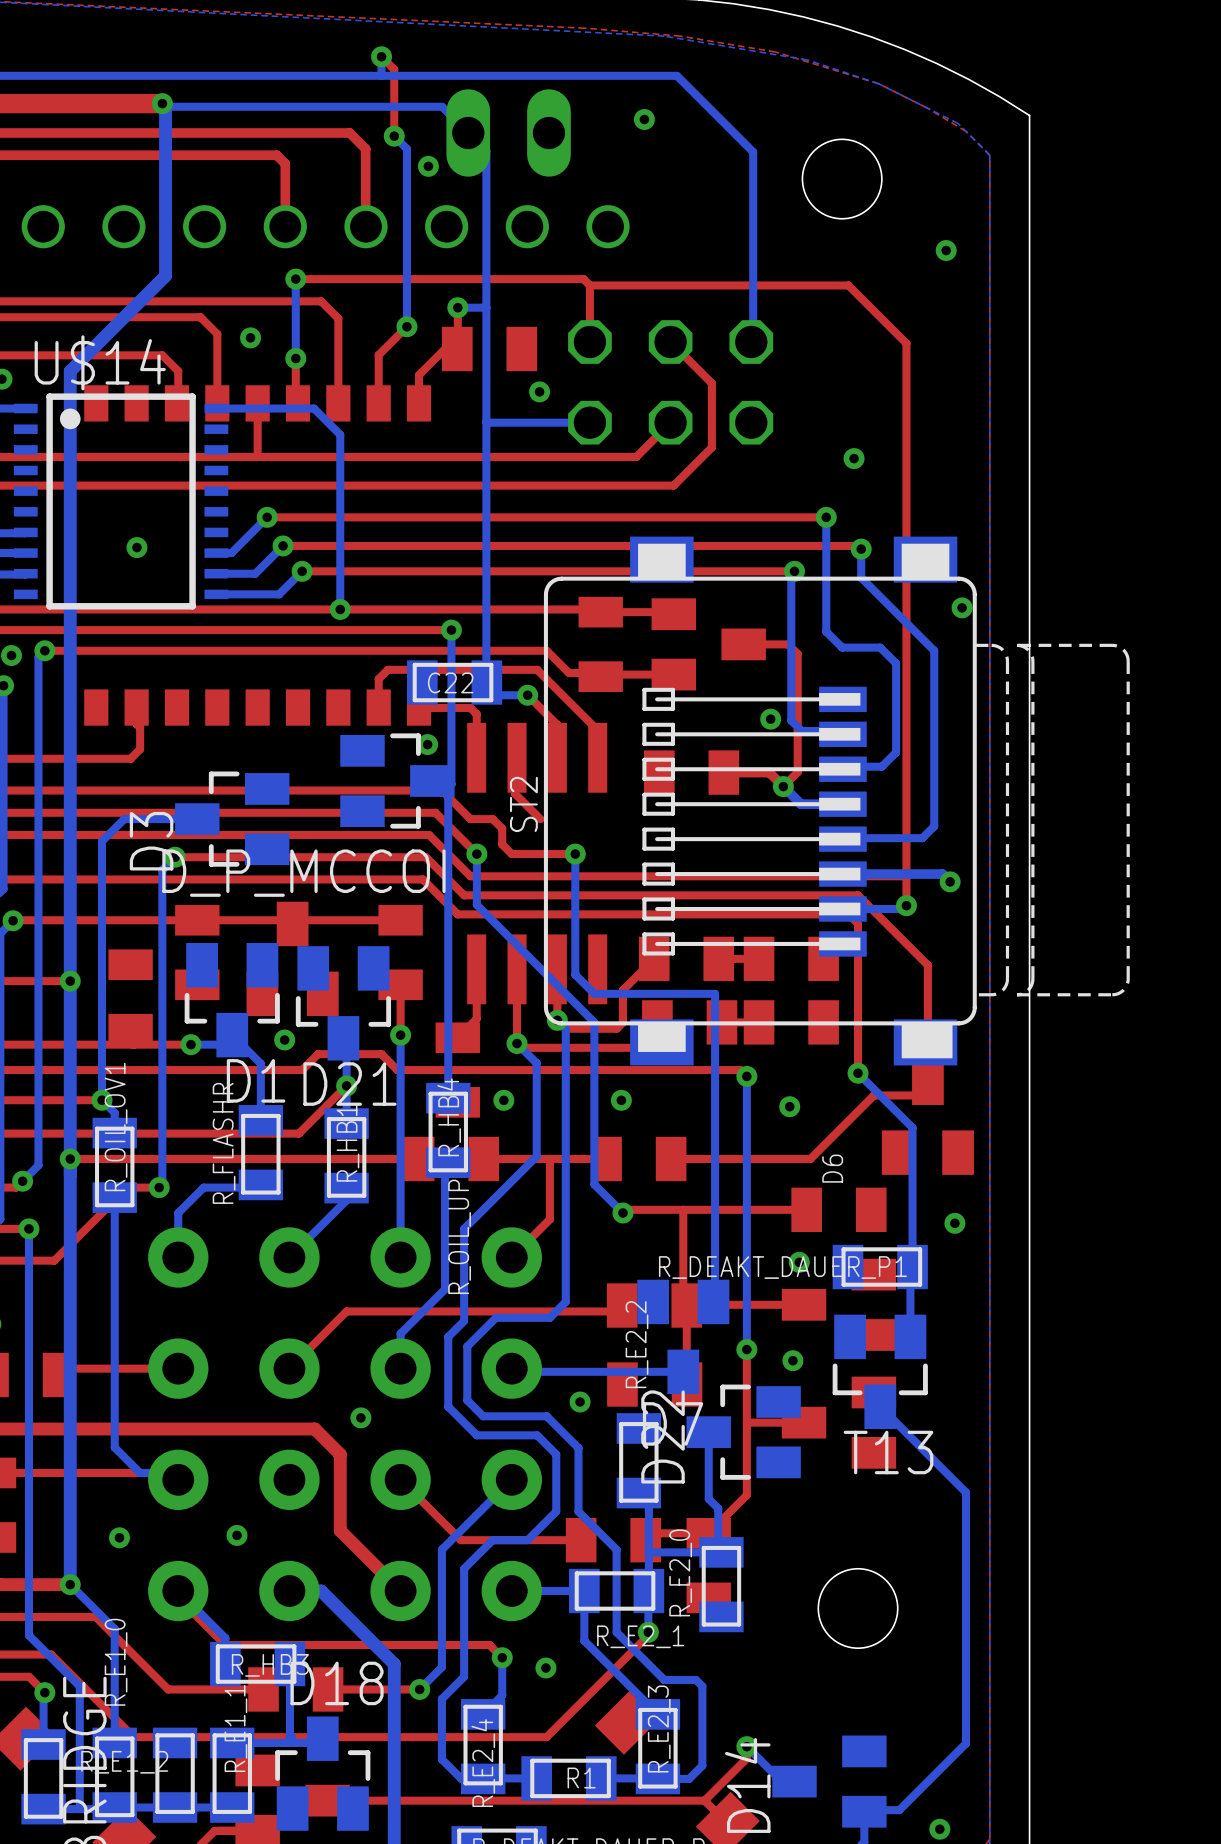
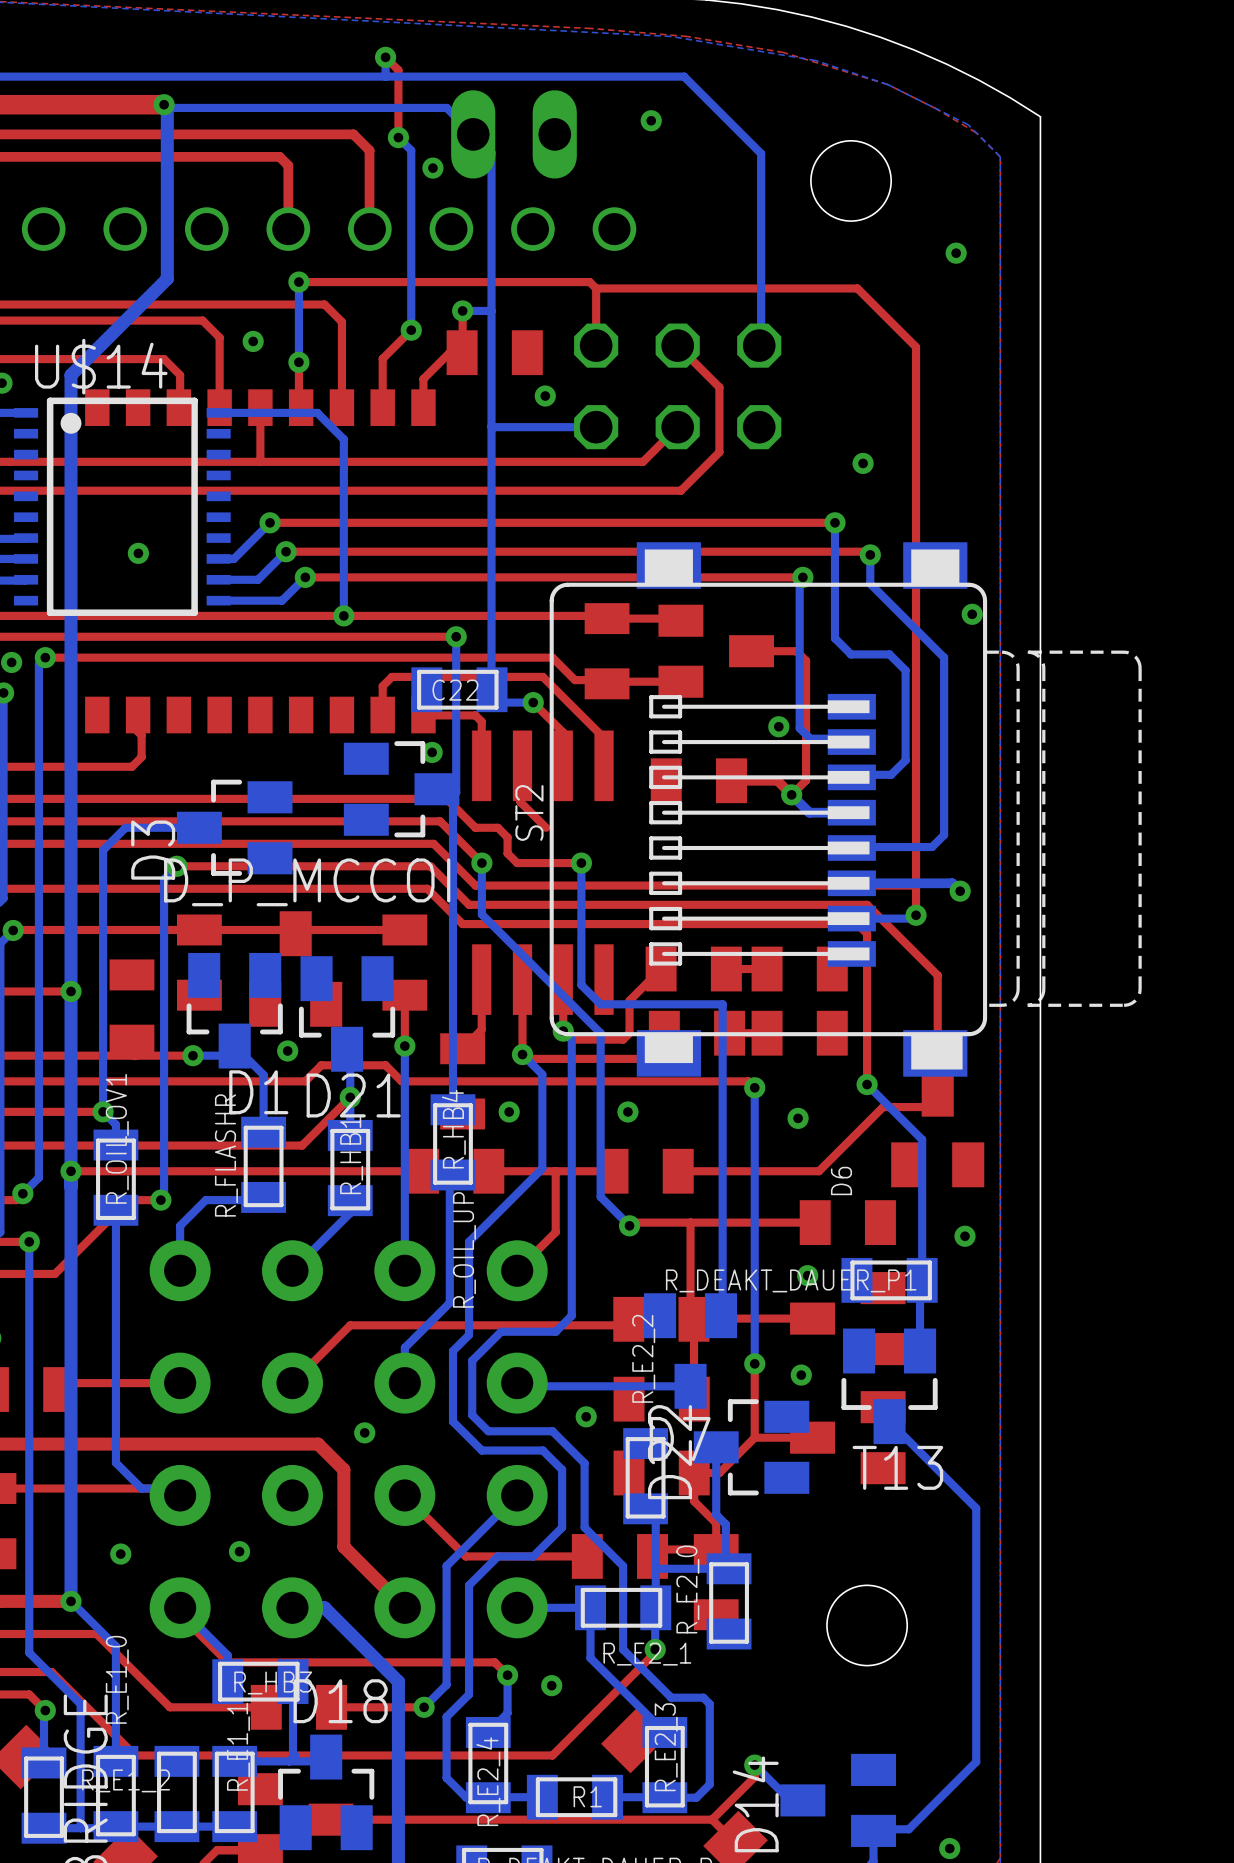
top track: (746, 1422) (746, 1495) (708, 1533) -> (754, 1437) (719, 1472) (694, 1472) (694, 1501) (716, 1523) (716, 1549)
part: none -> (661, 1472)

